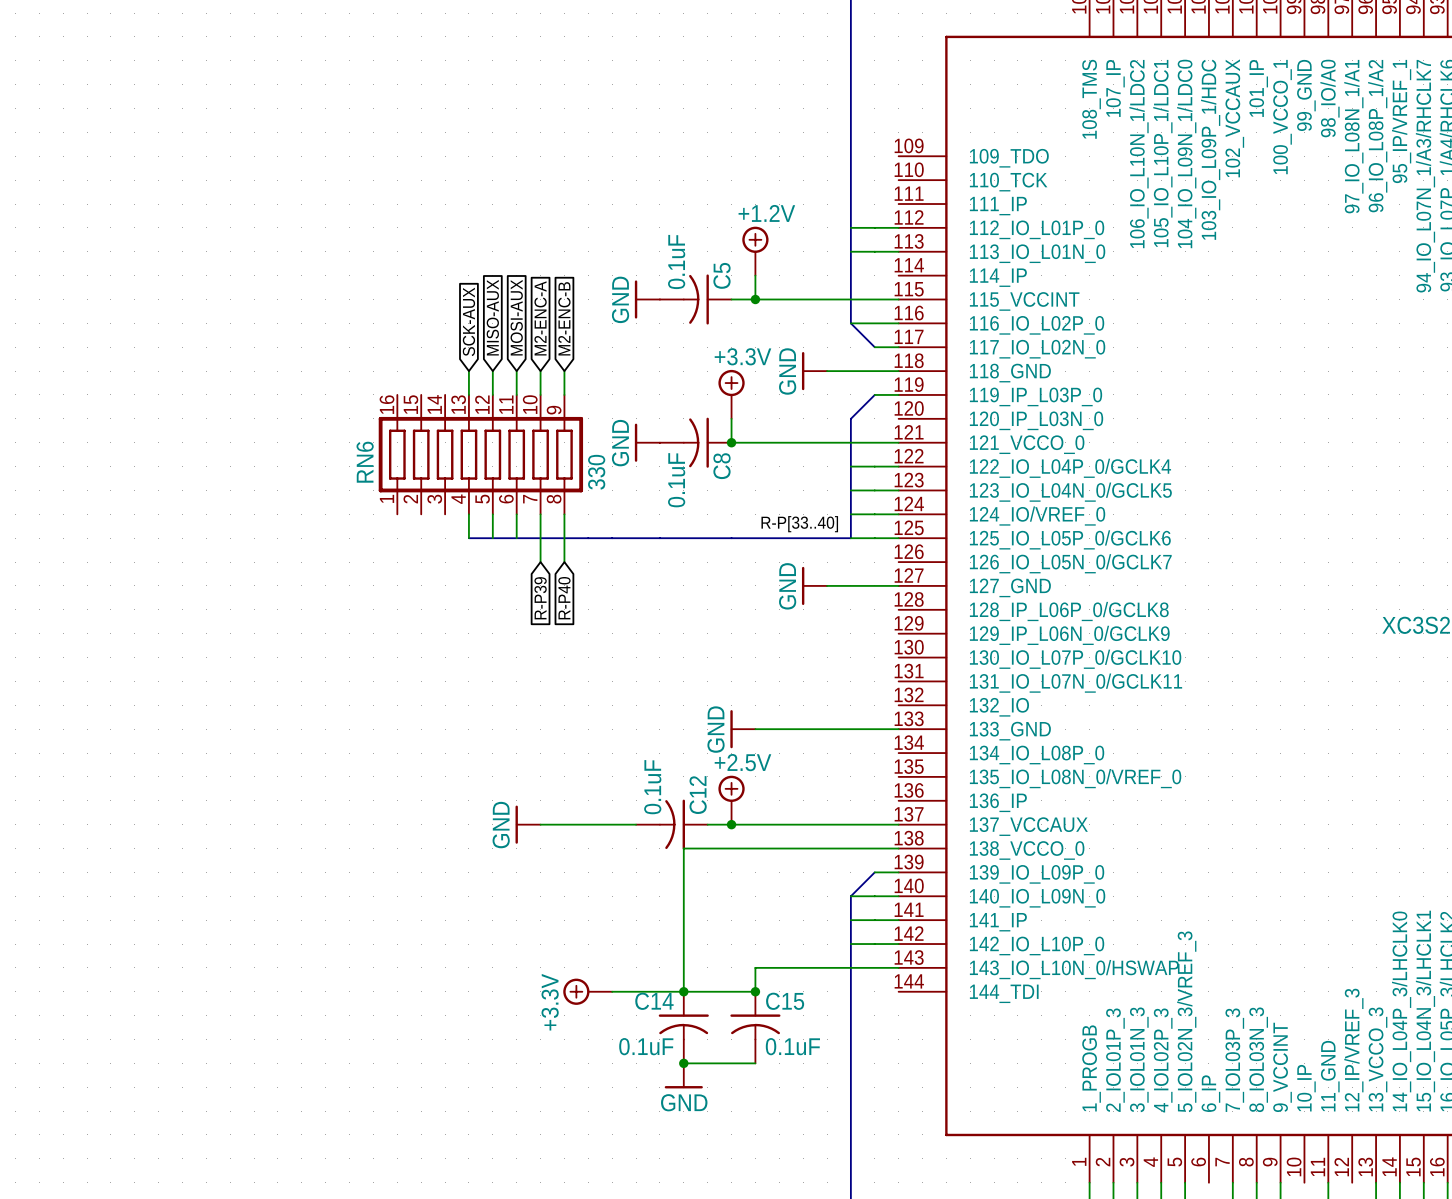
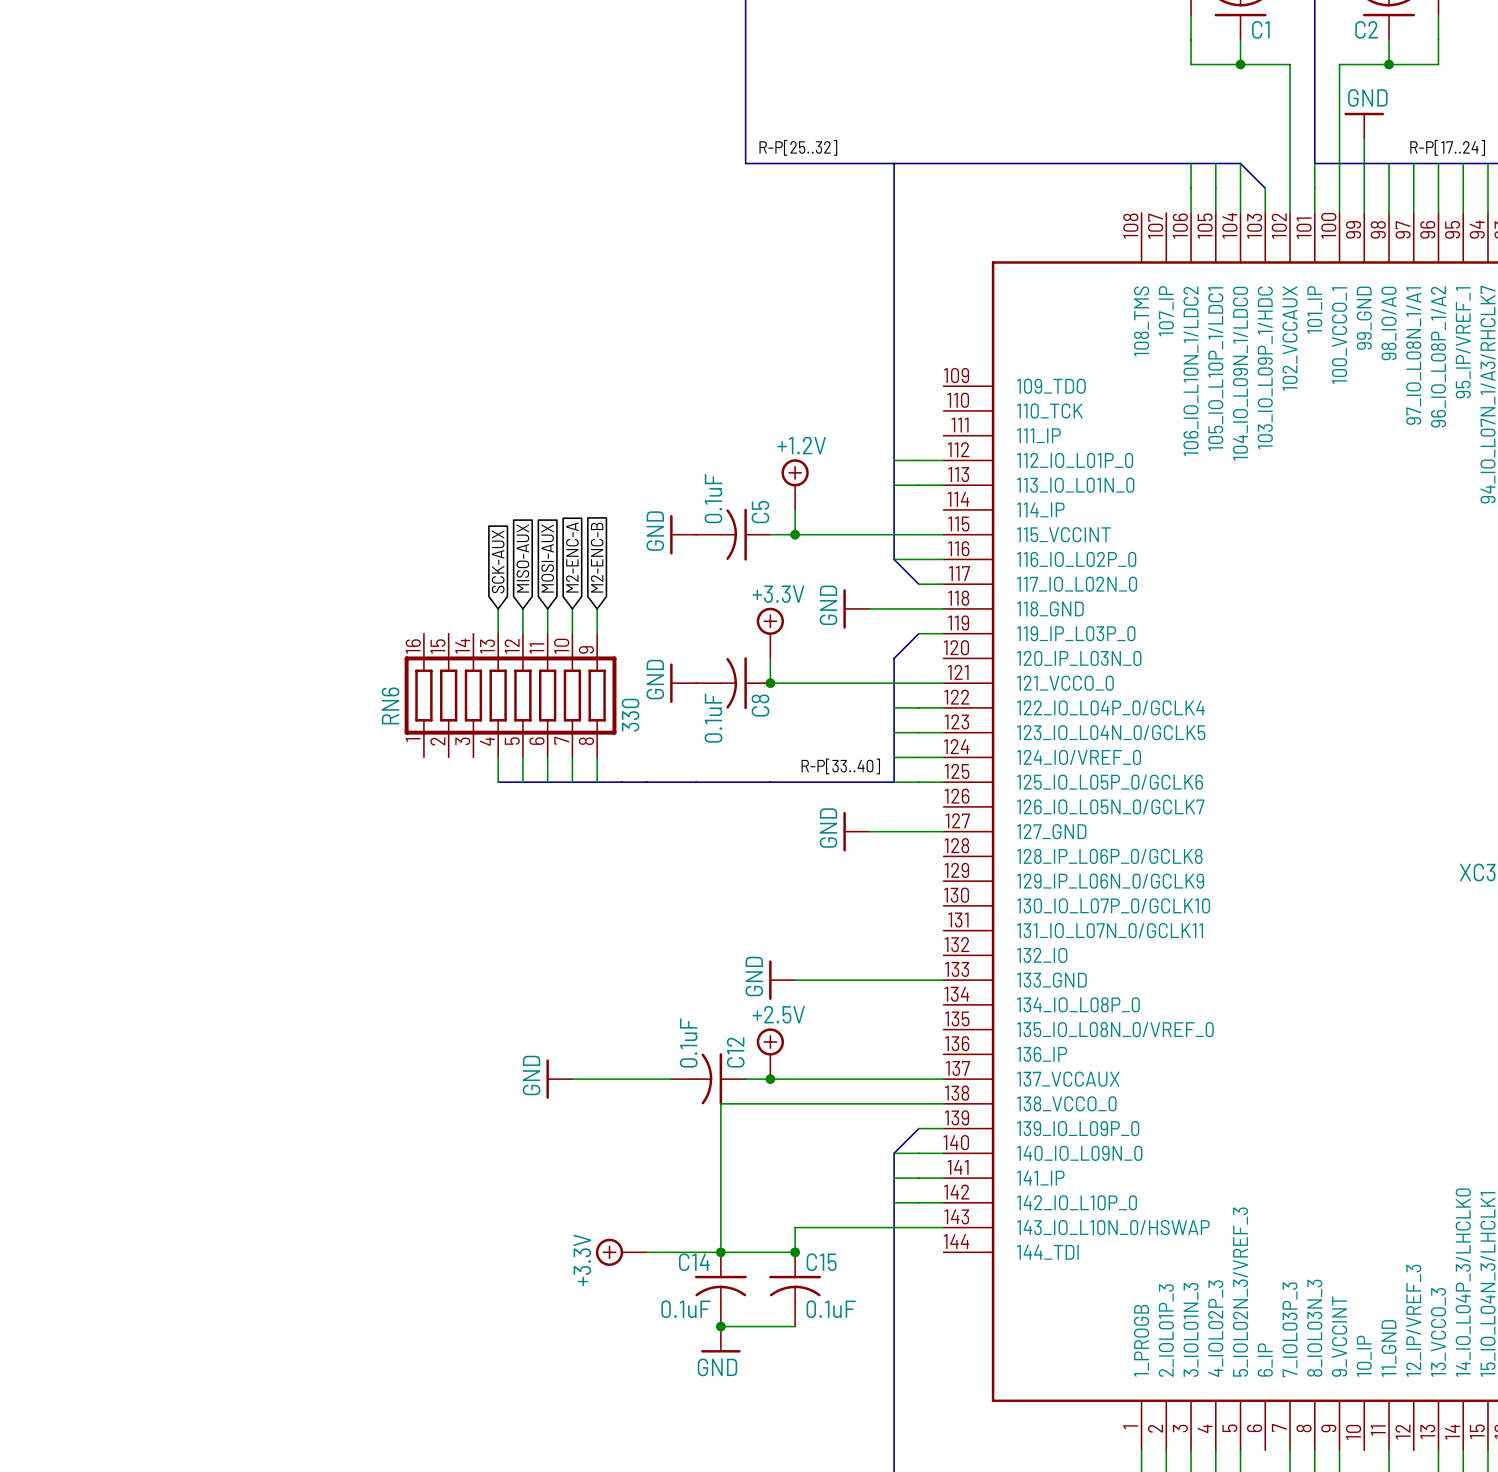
wire: (540, 538) (540, 562) -> none
wire: (564, 538) (564, 562) -> none
global label: R-P39 (540, 598) -> none
global label: R-P40 (564, 598) -> none

